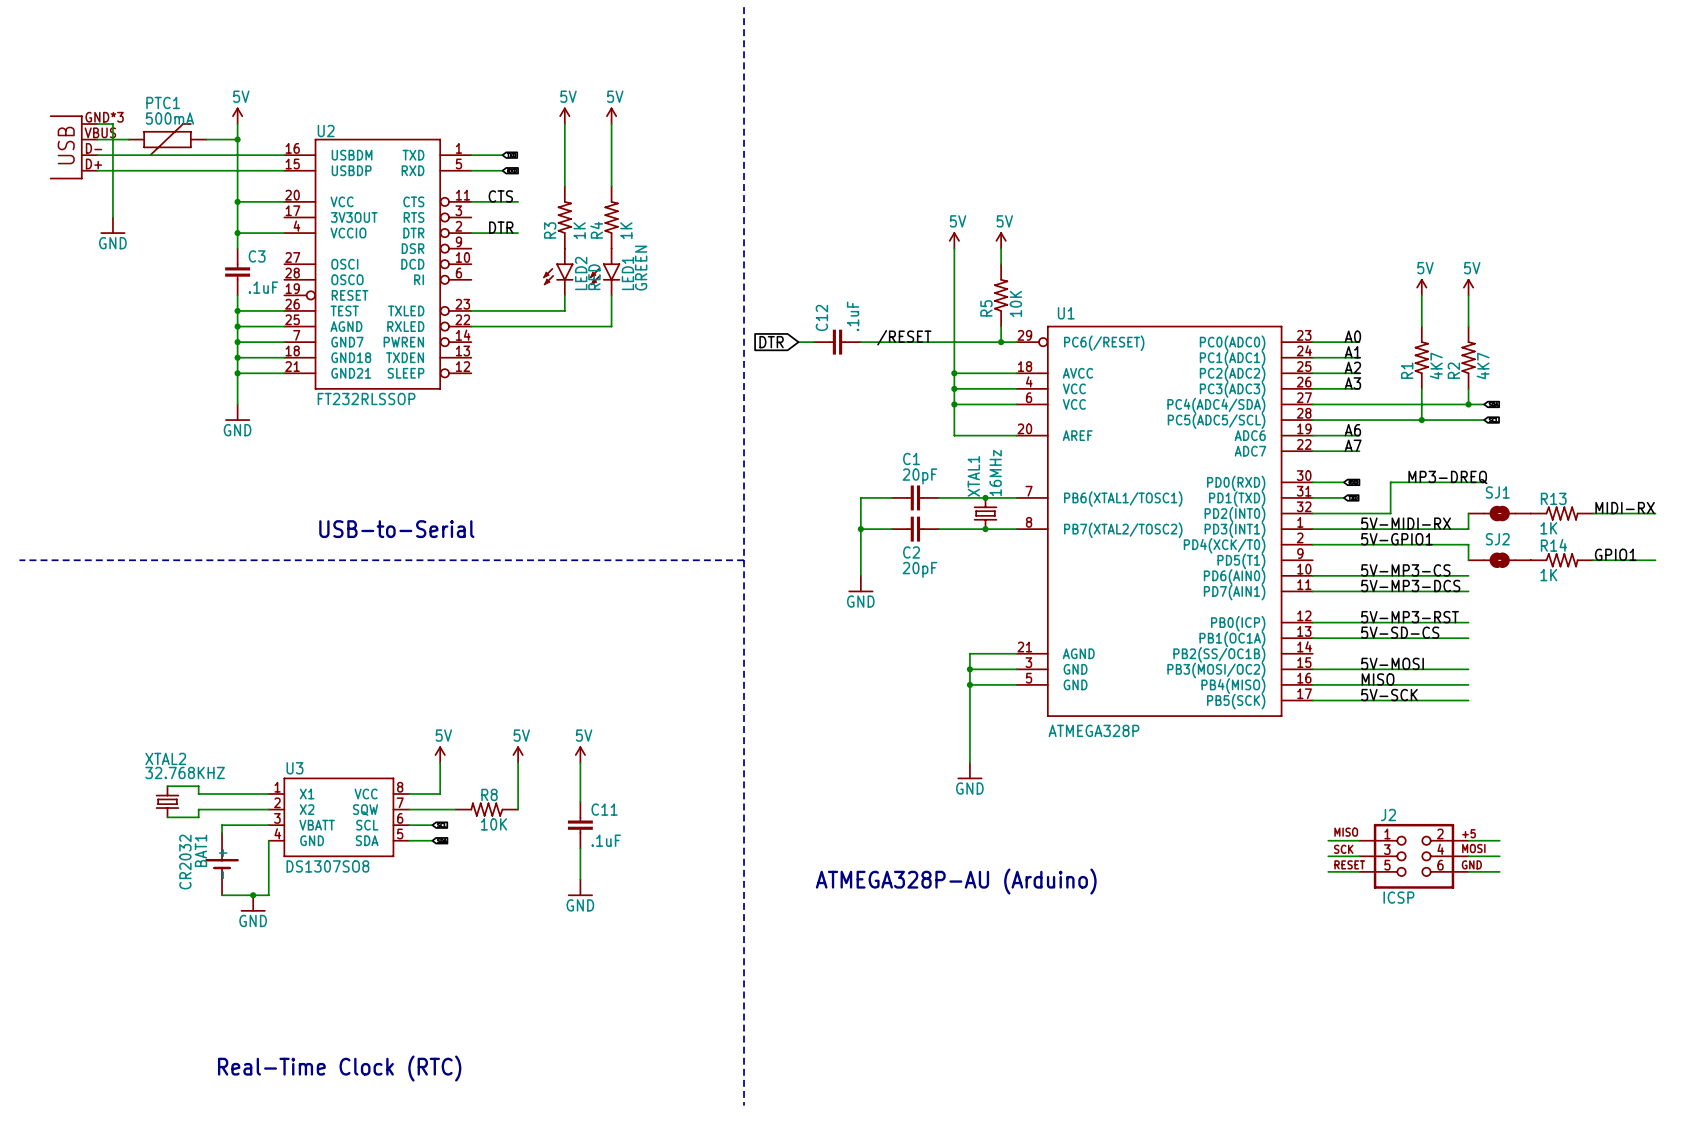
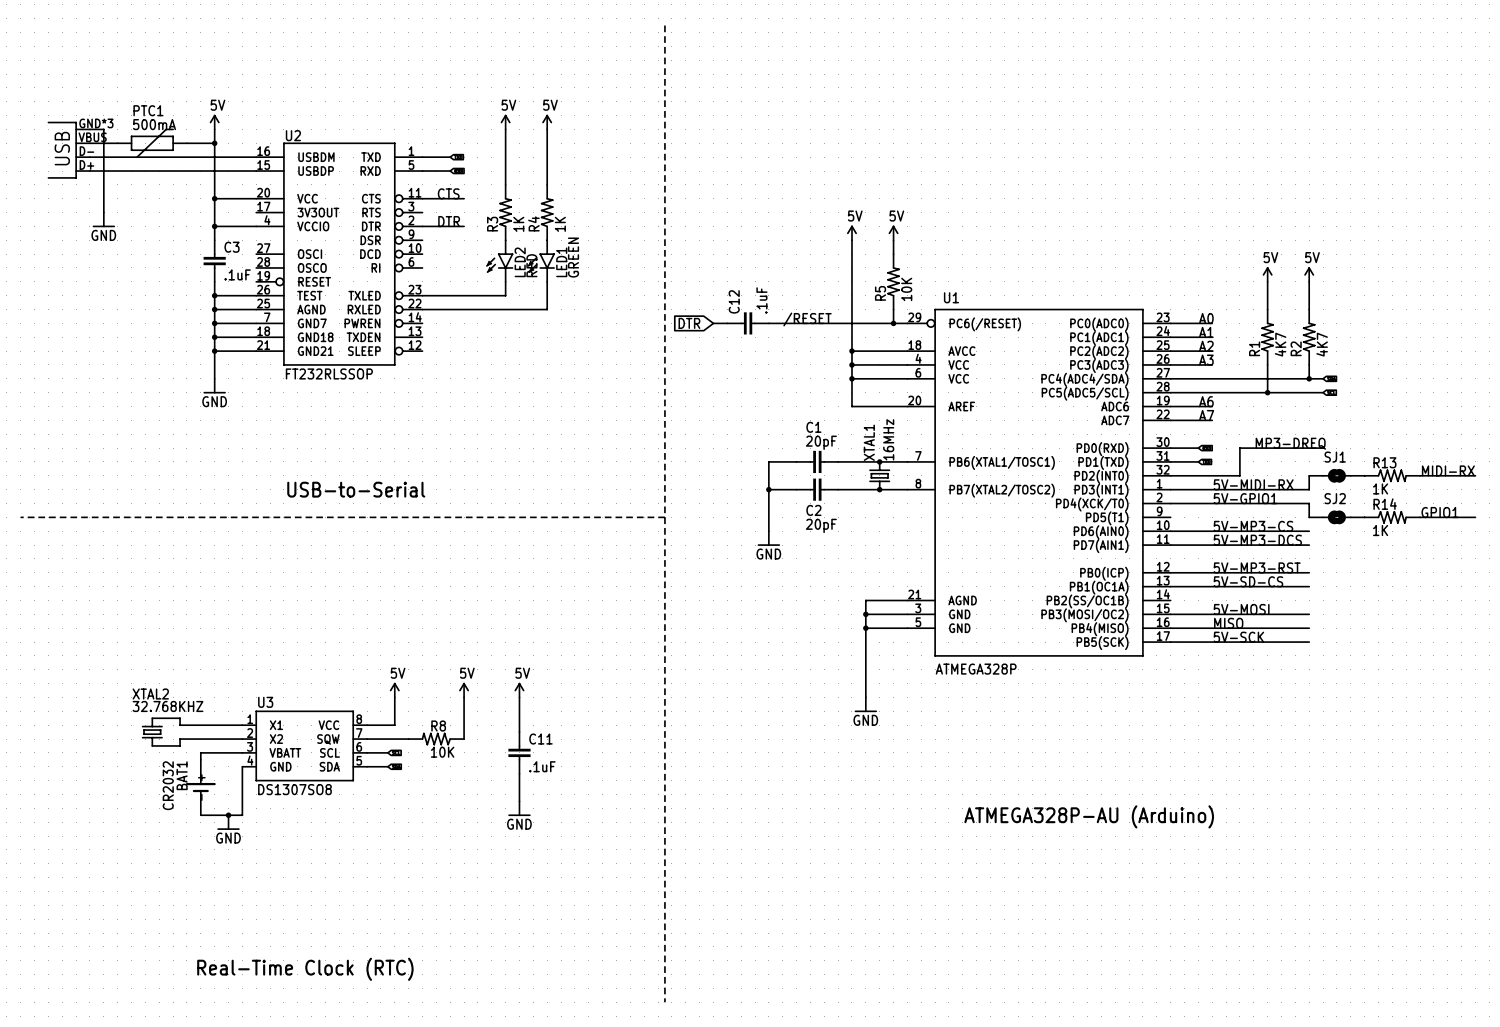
wire: (1328, 840) (1359, 840) -> none
wire: (1468, 840) (1499, 840) -> none
wire: (1328, 856) (1359, 856) -> none
J2: ICSP (1414, 856) -> none
wire: (1468, 856) (1499, 856) -> none
wire: (1328, 871) (1359, 871) -> none
wire: (1468, 871) (1499, 871) -> none
text: ATMEGA328P-AU (Arduino) (956, 881) -> none
text: none -> ATMEGA328P-AU (Arduino) (1089, 816)

